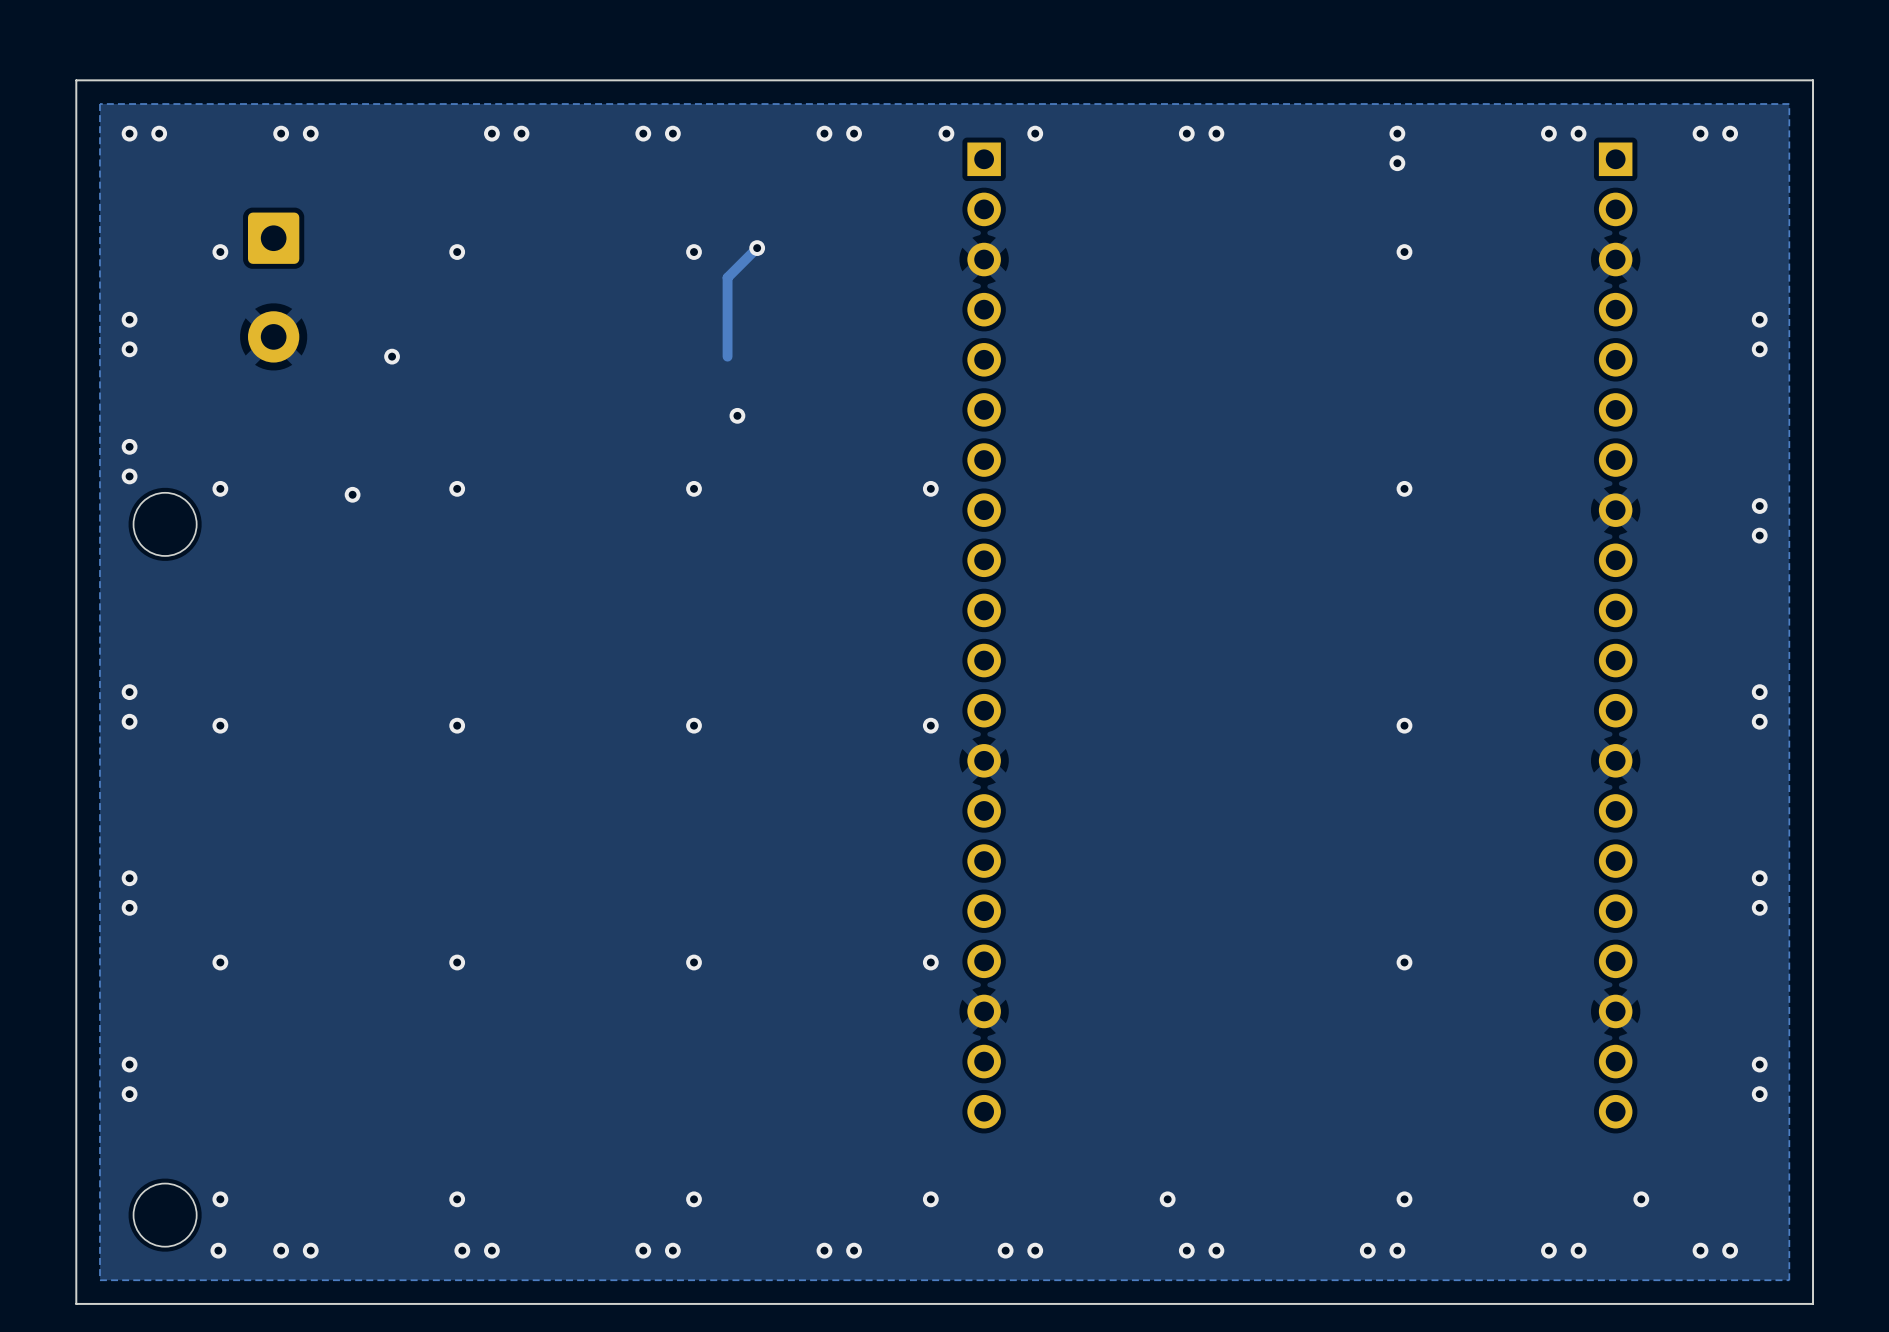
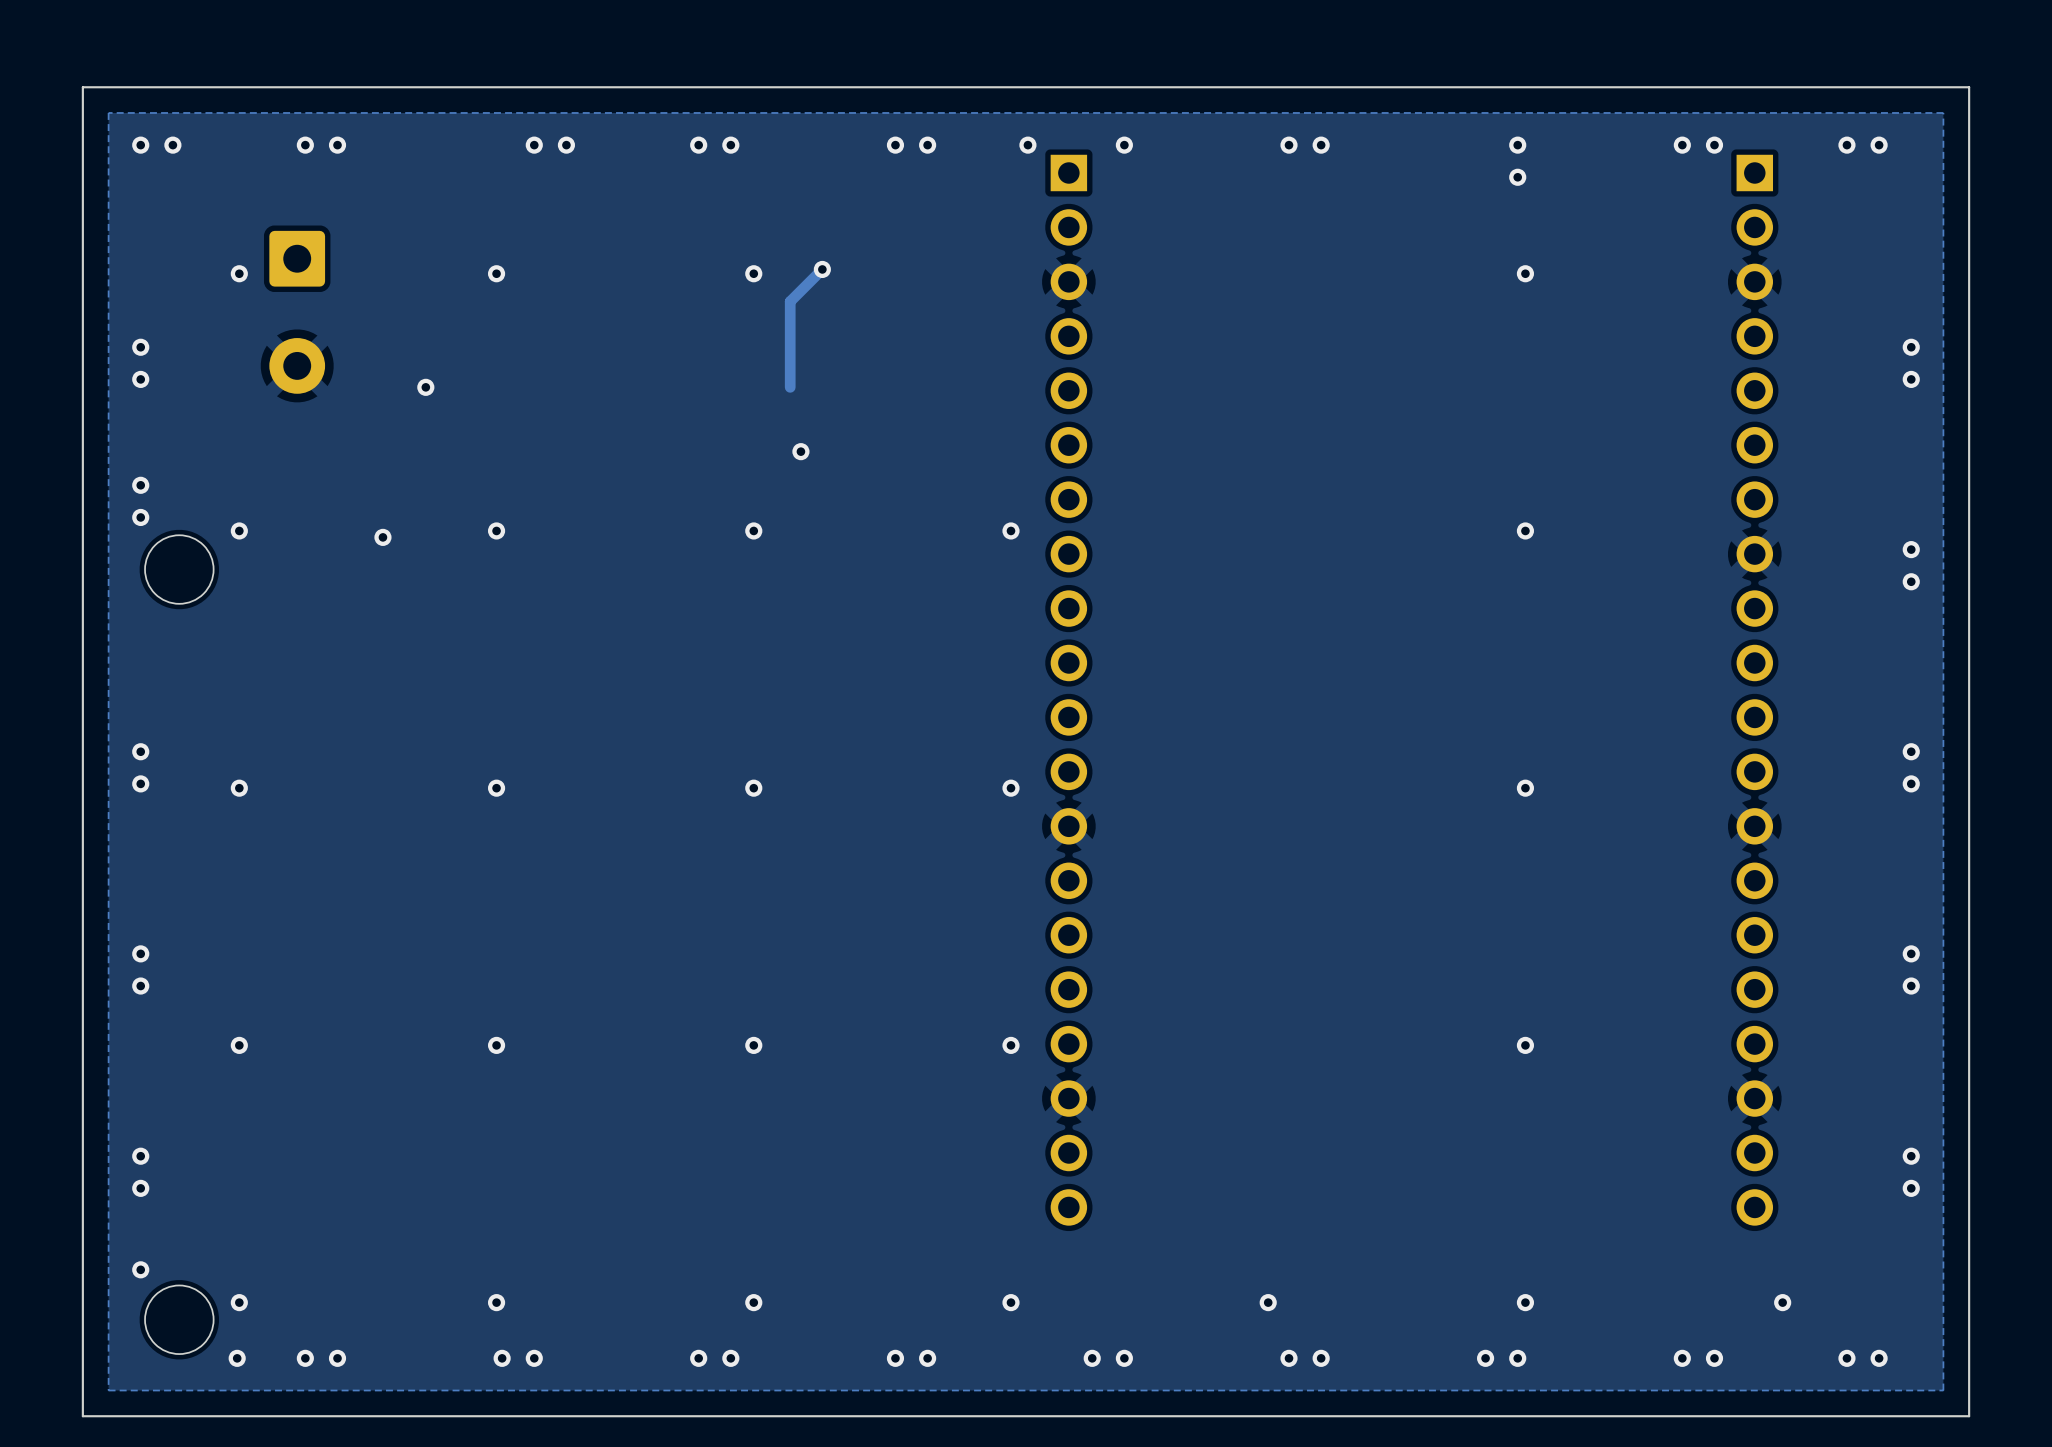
via: none -> (140, 1269)

